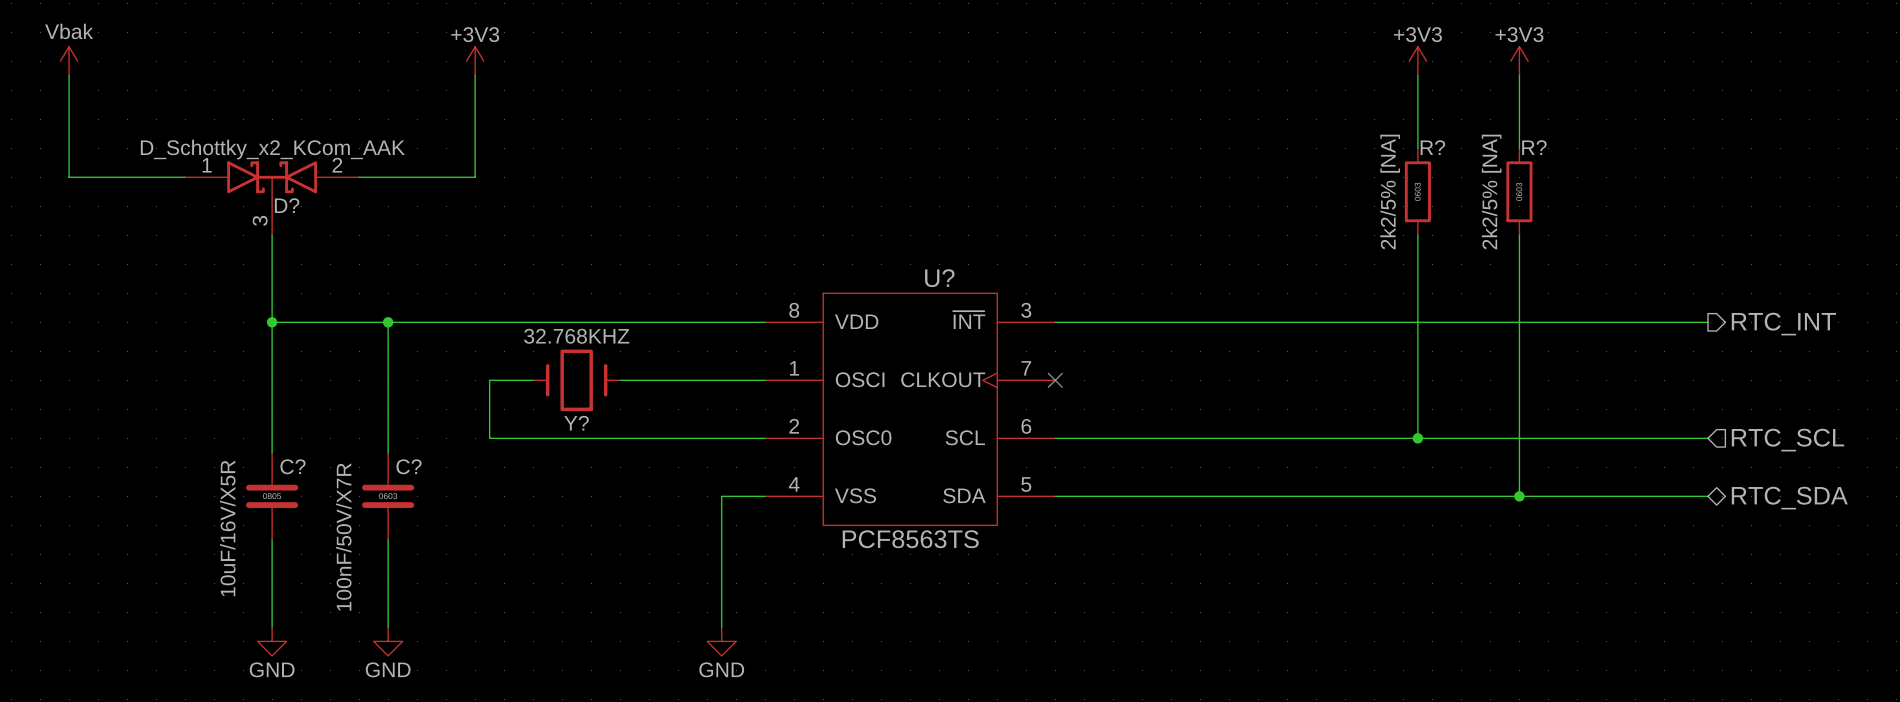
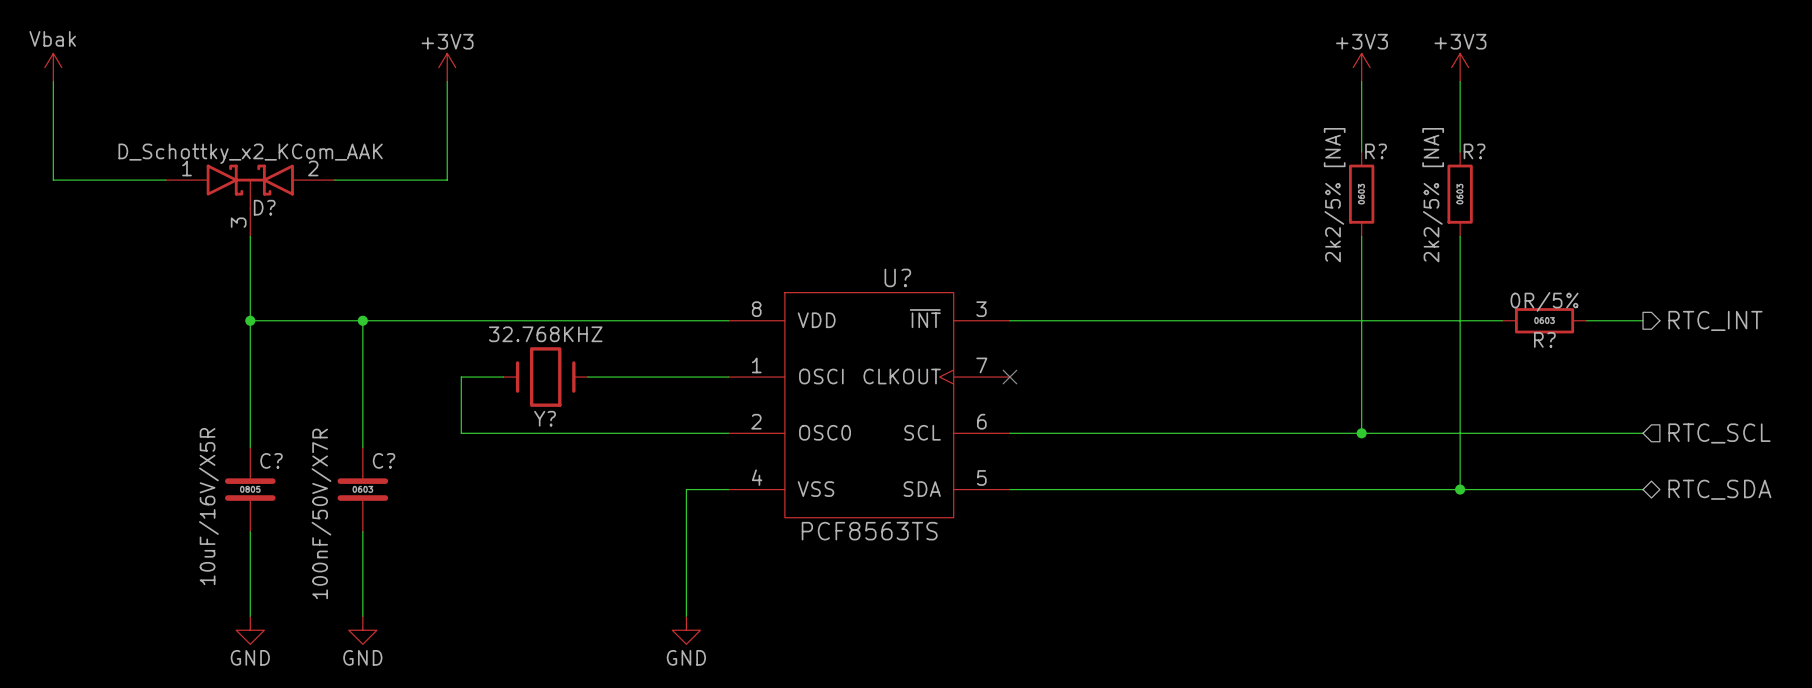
wire: (1562, 322) (1649, 322) -> none
R?: none -> 0R/5% (1544, 320)

